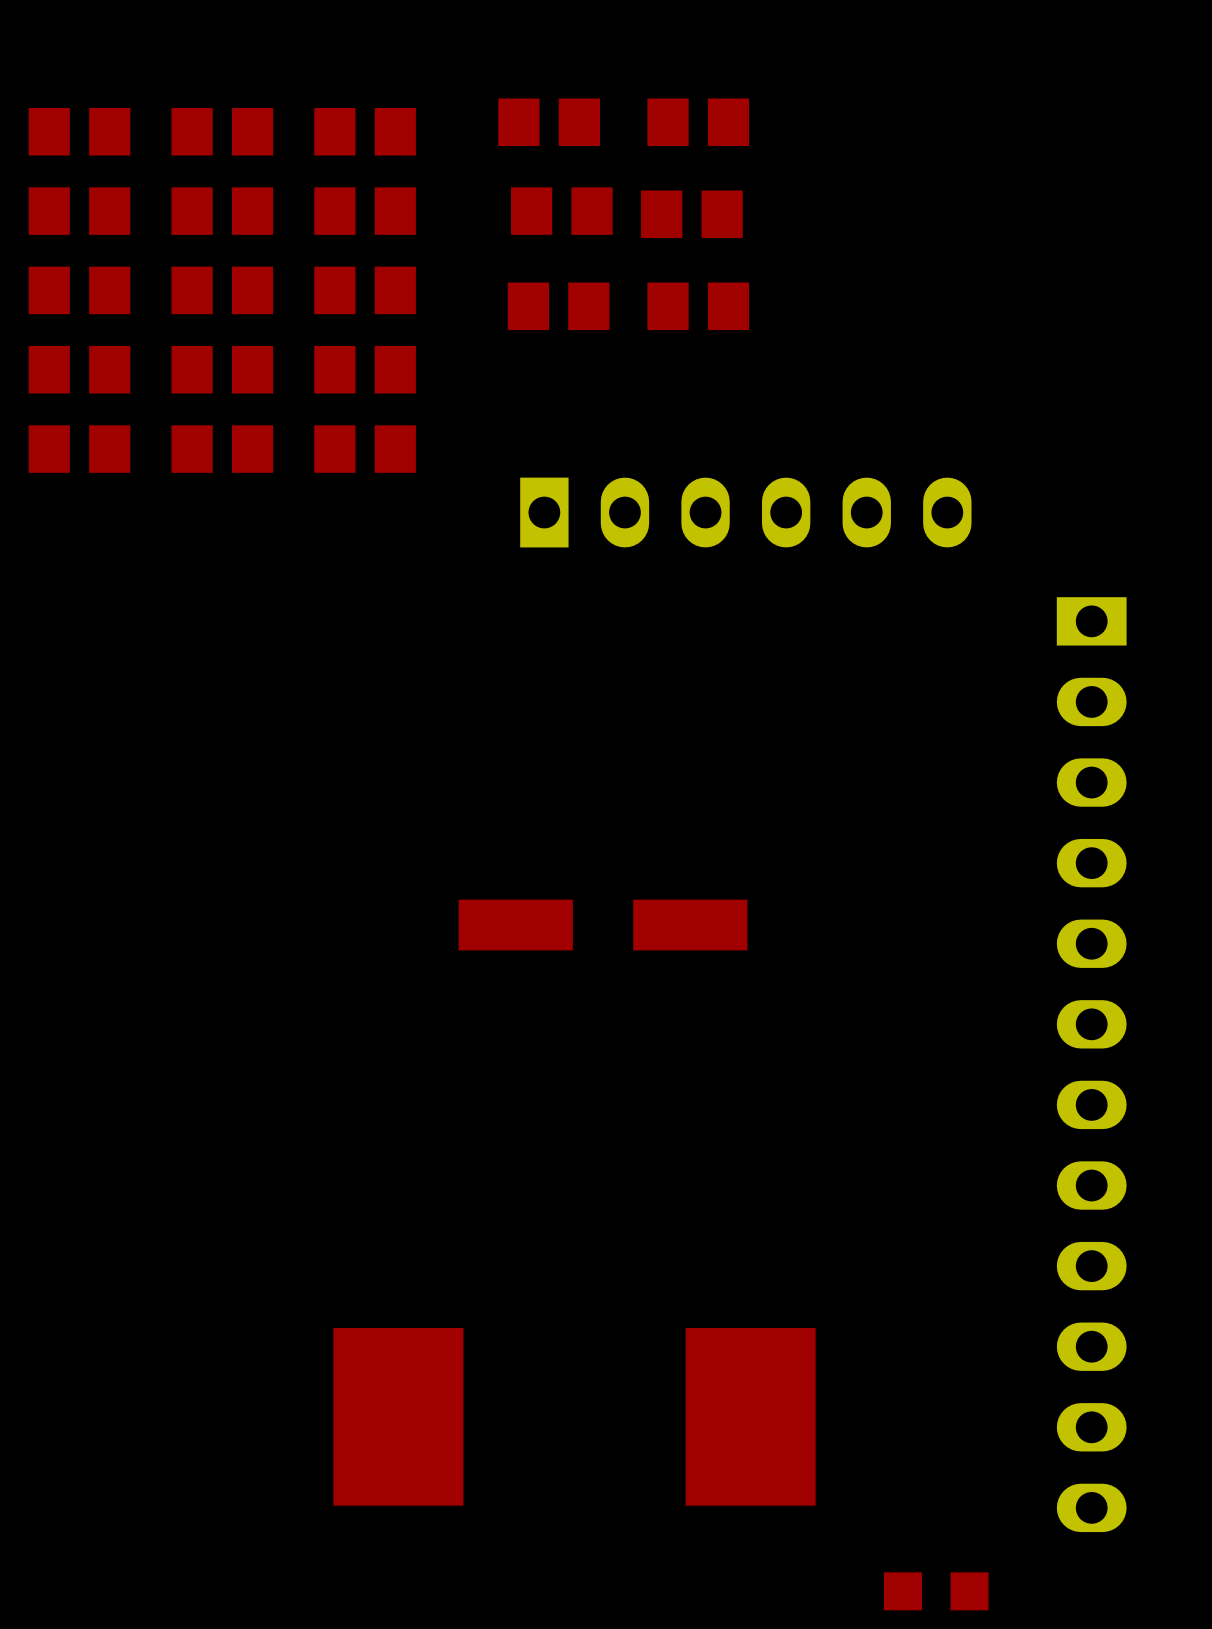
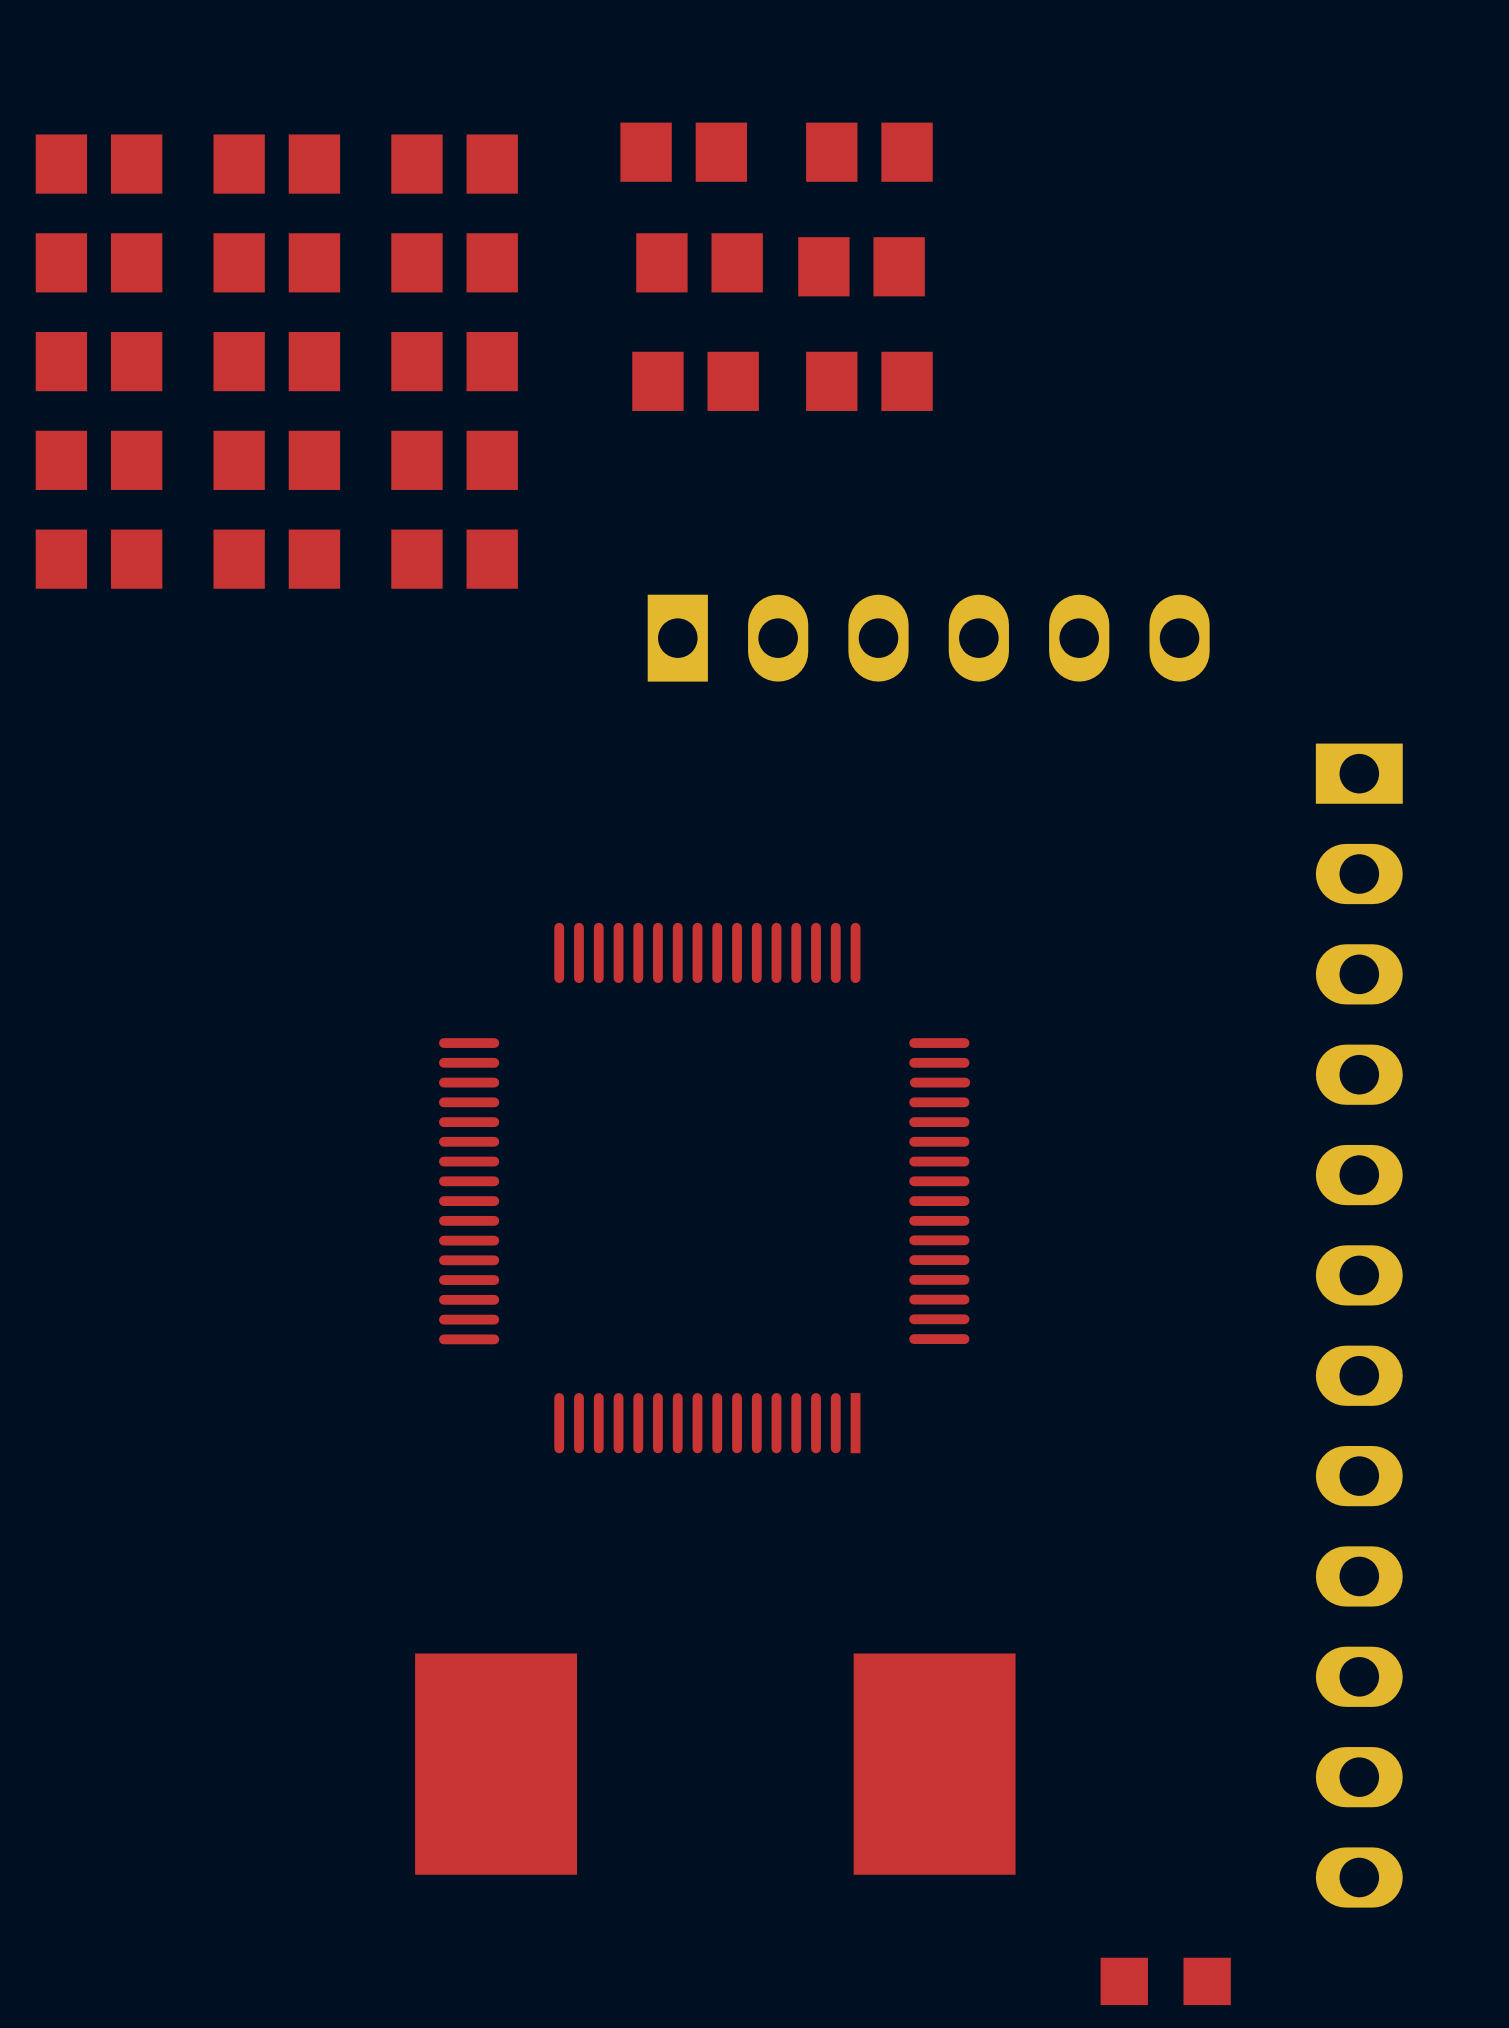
part: (603, 925) -> none
part: none -> (704, 1188)

